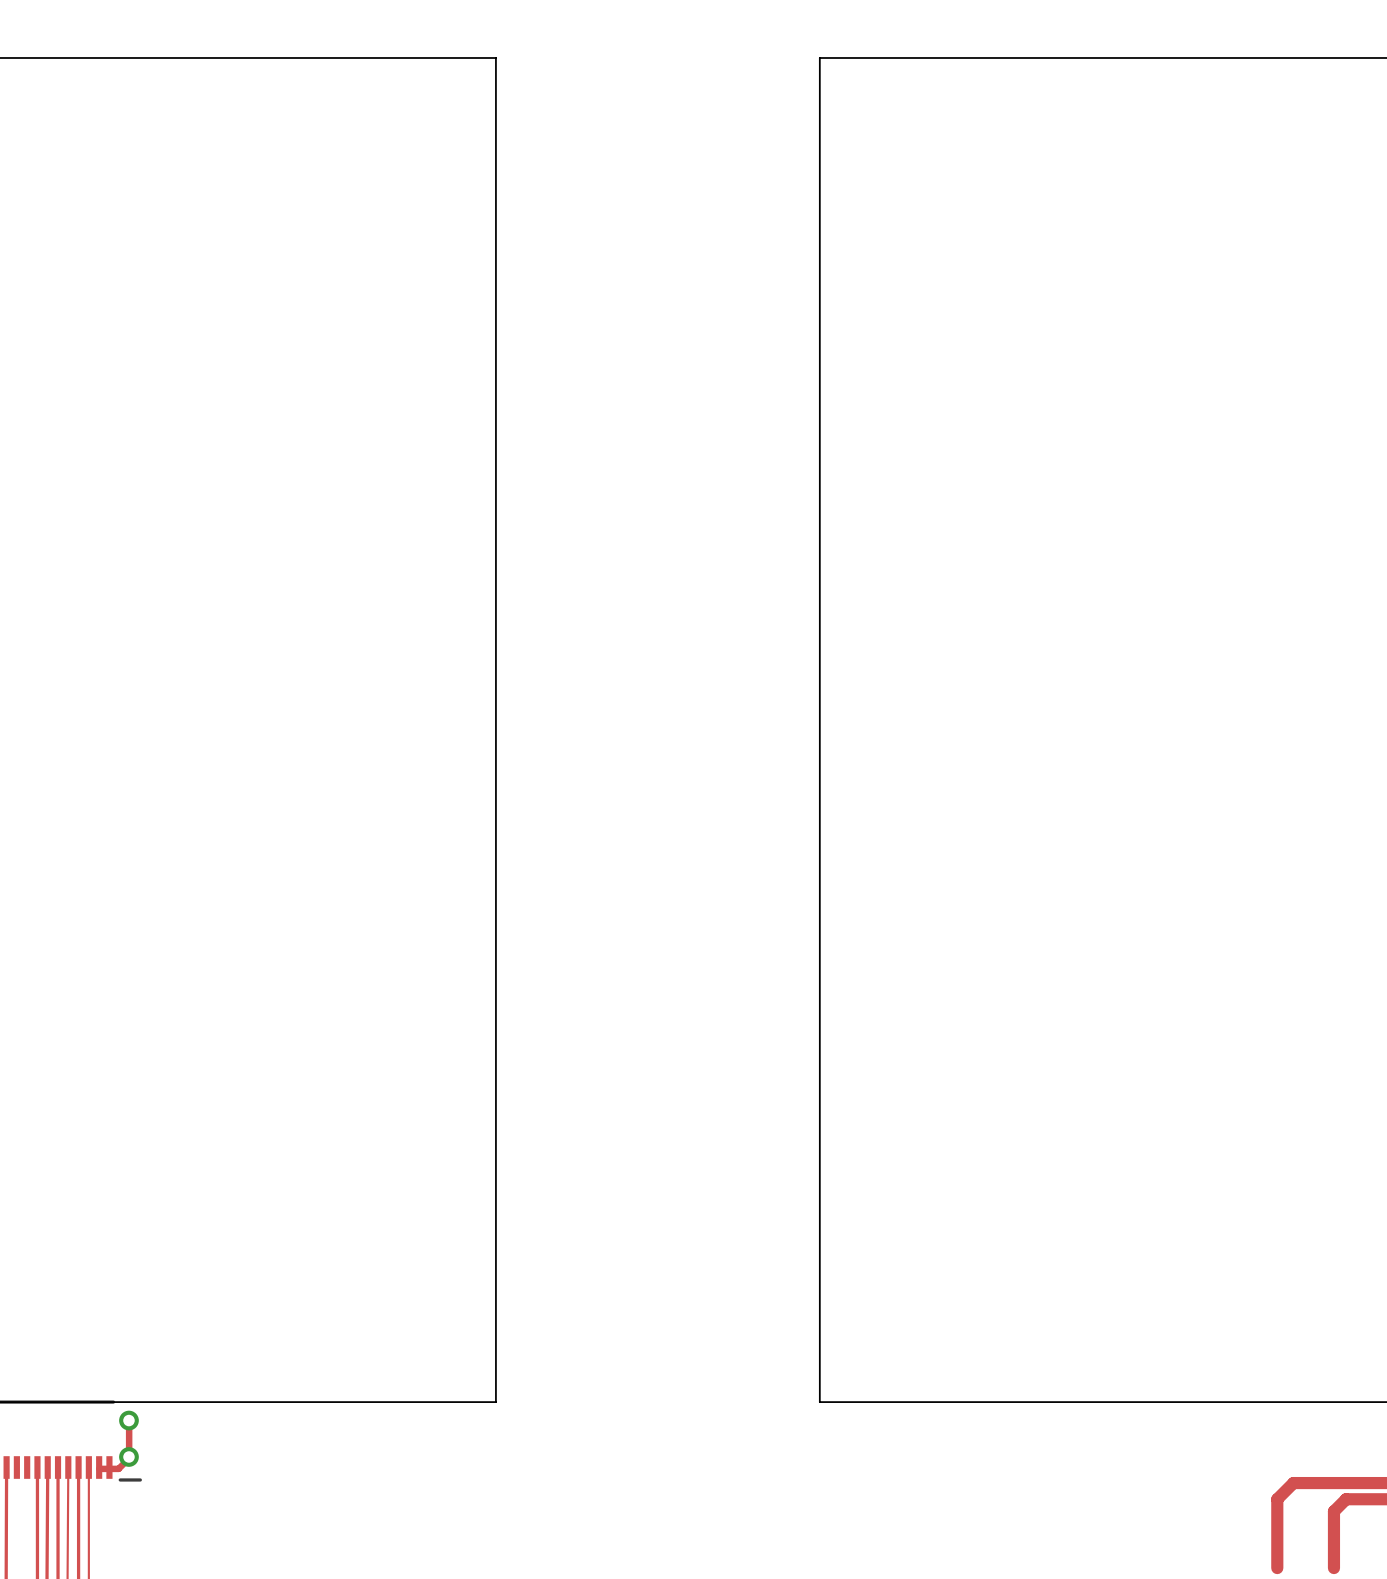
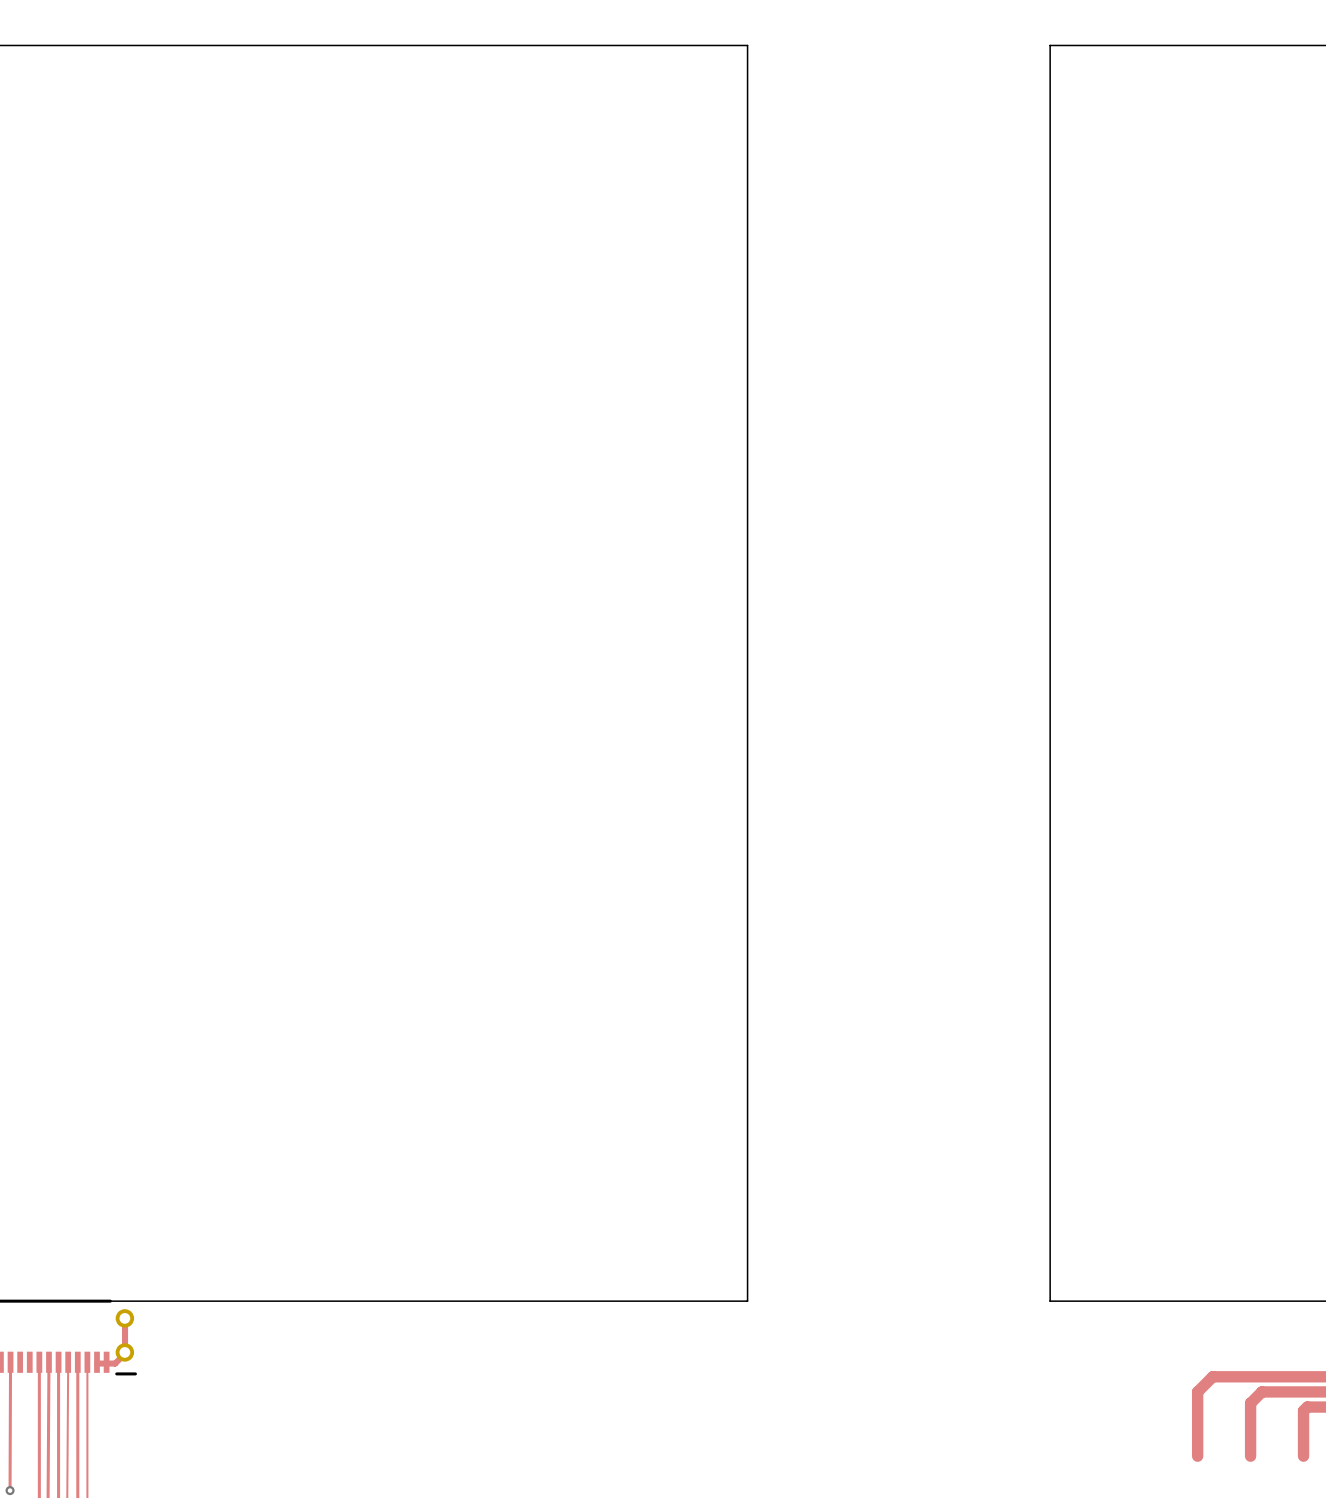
board edge: (495, 57) (495, 1402) -> (467, 45) (747, 45) (747, 1301) (467, 1301)
board edge: (1119, 57) (819, 57) (819, 1402) (1119, 1402) -> (1050, 45) (1050, 1301)

